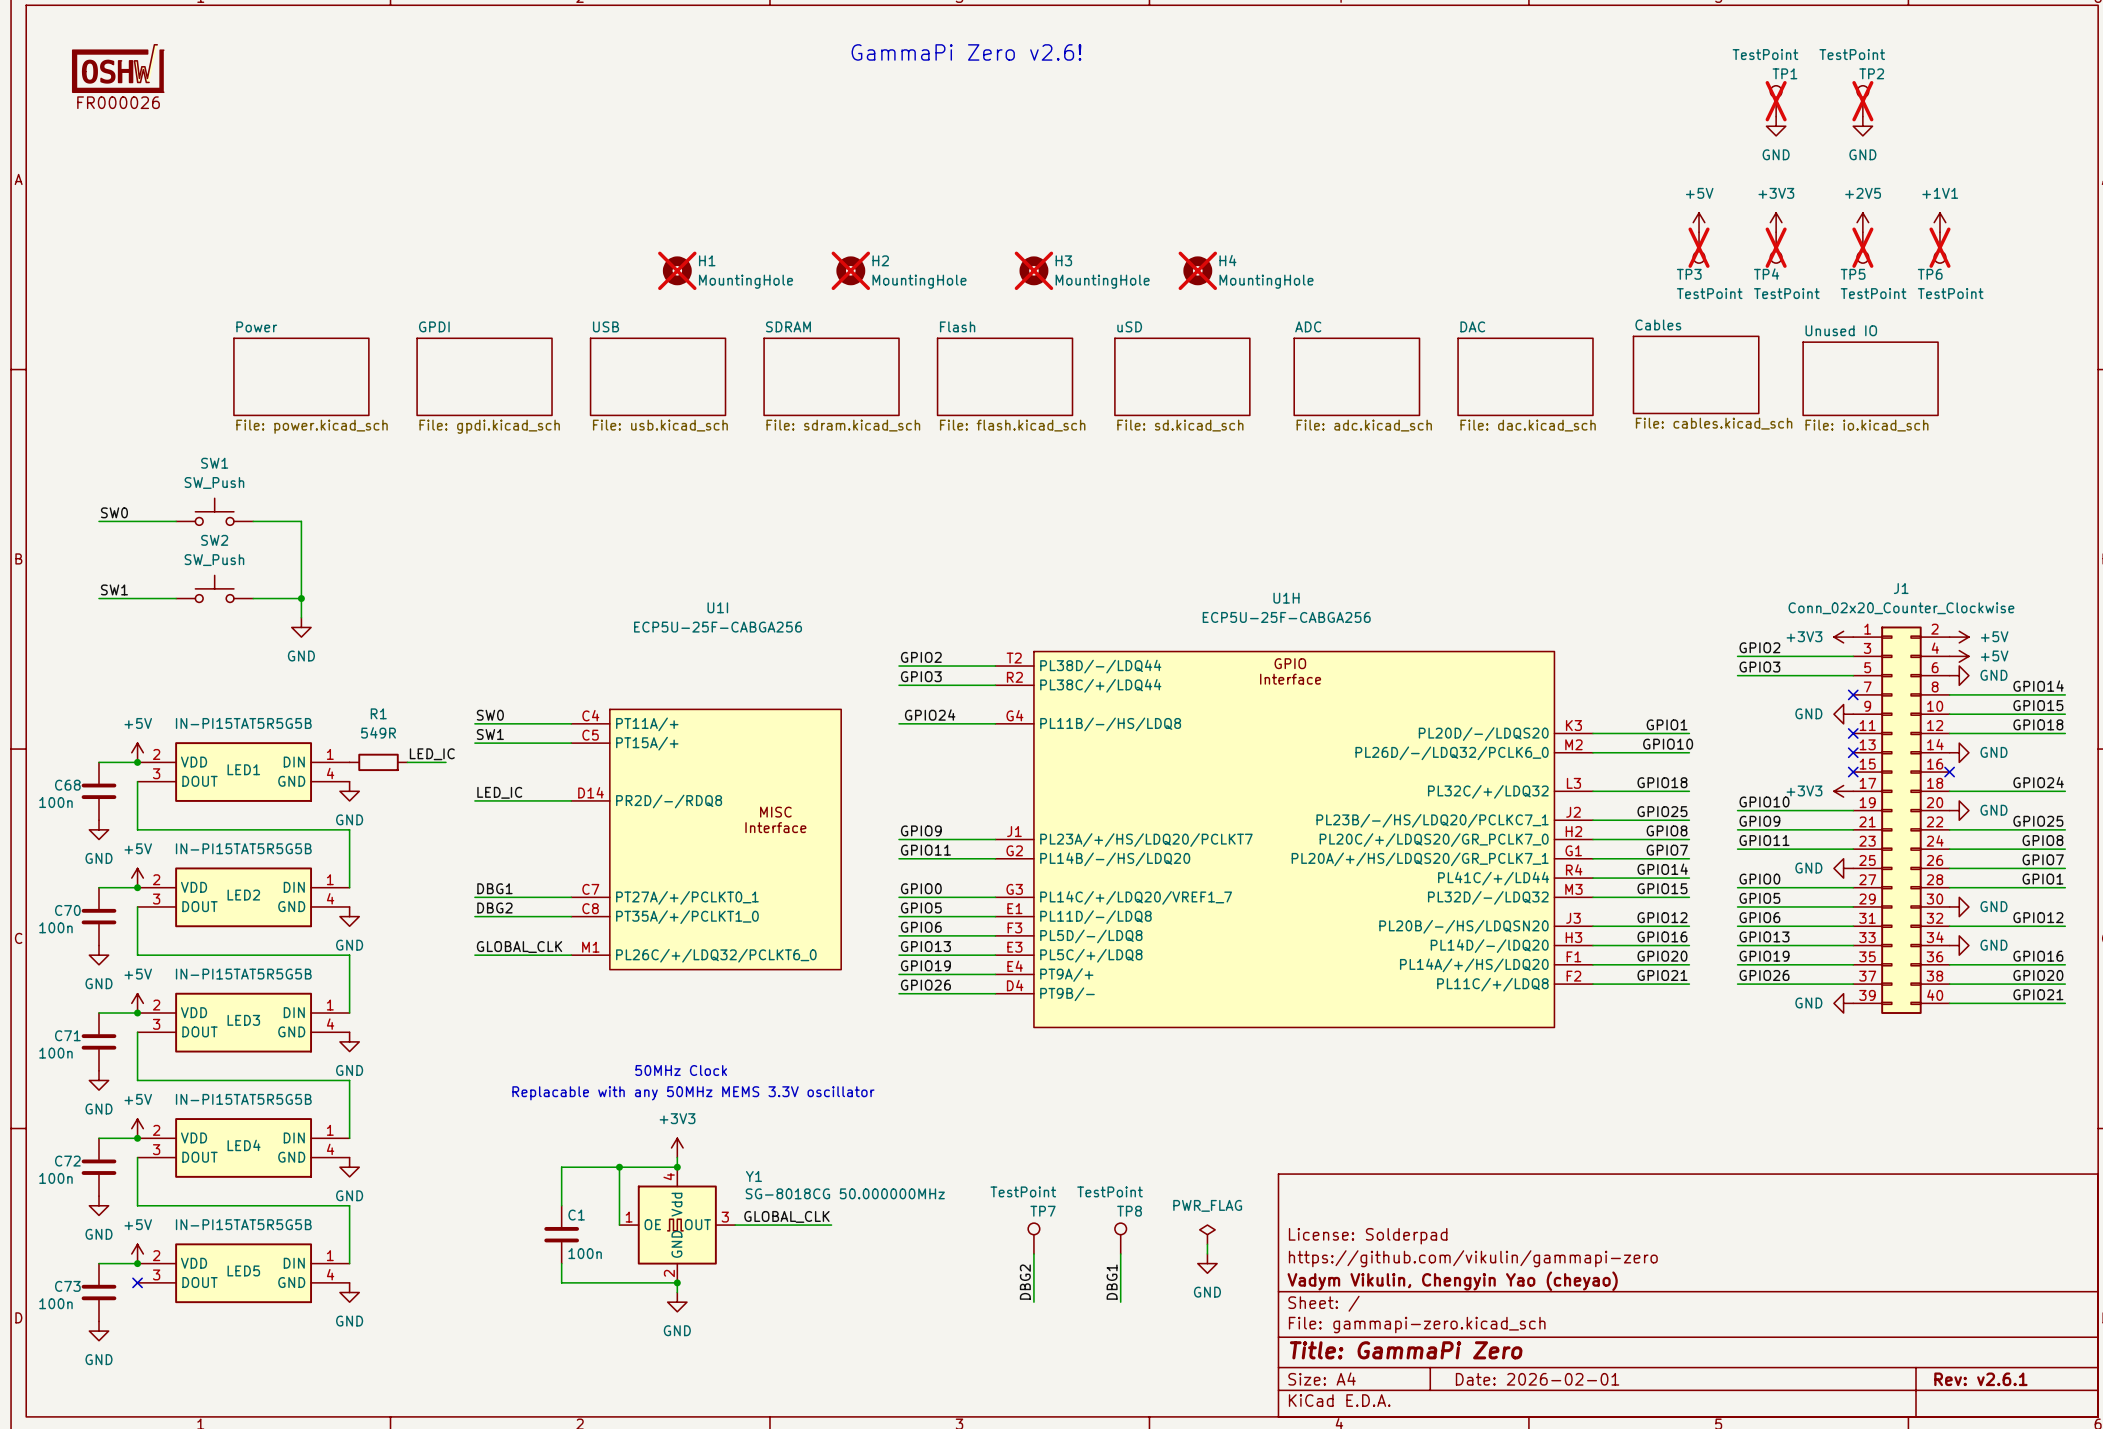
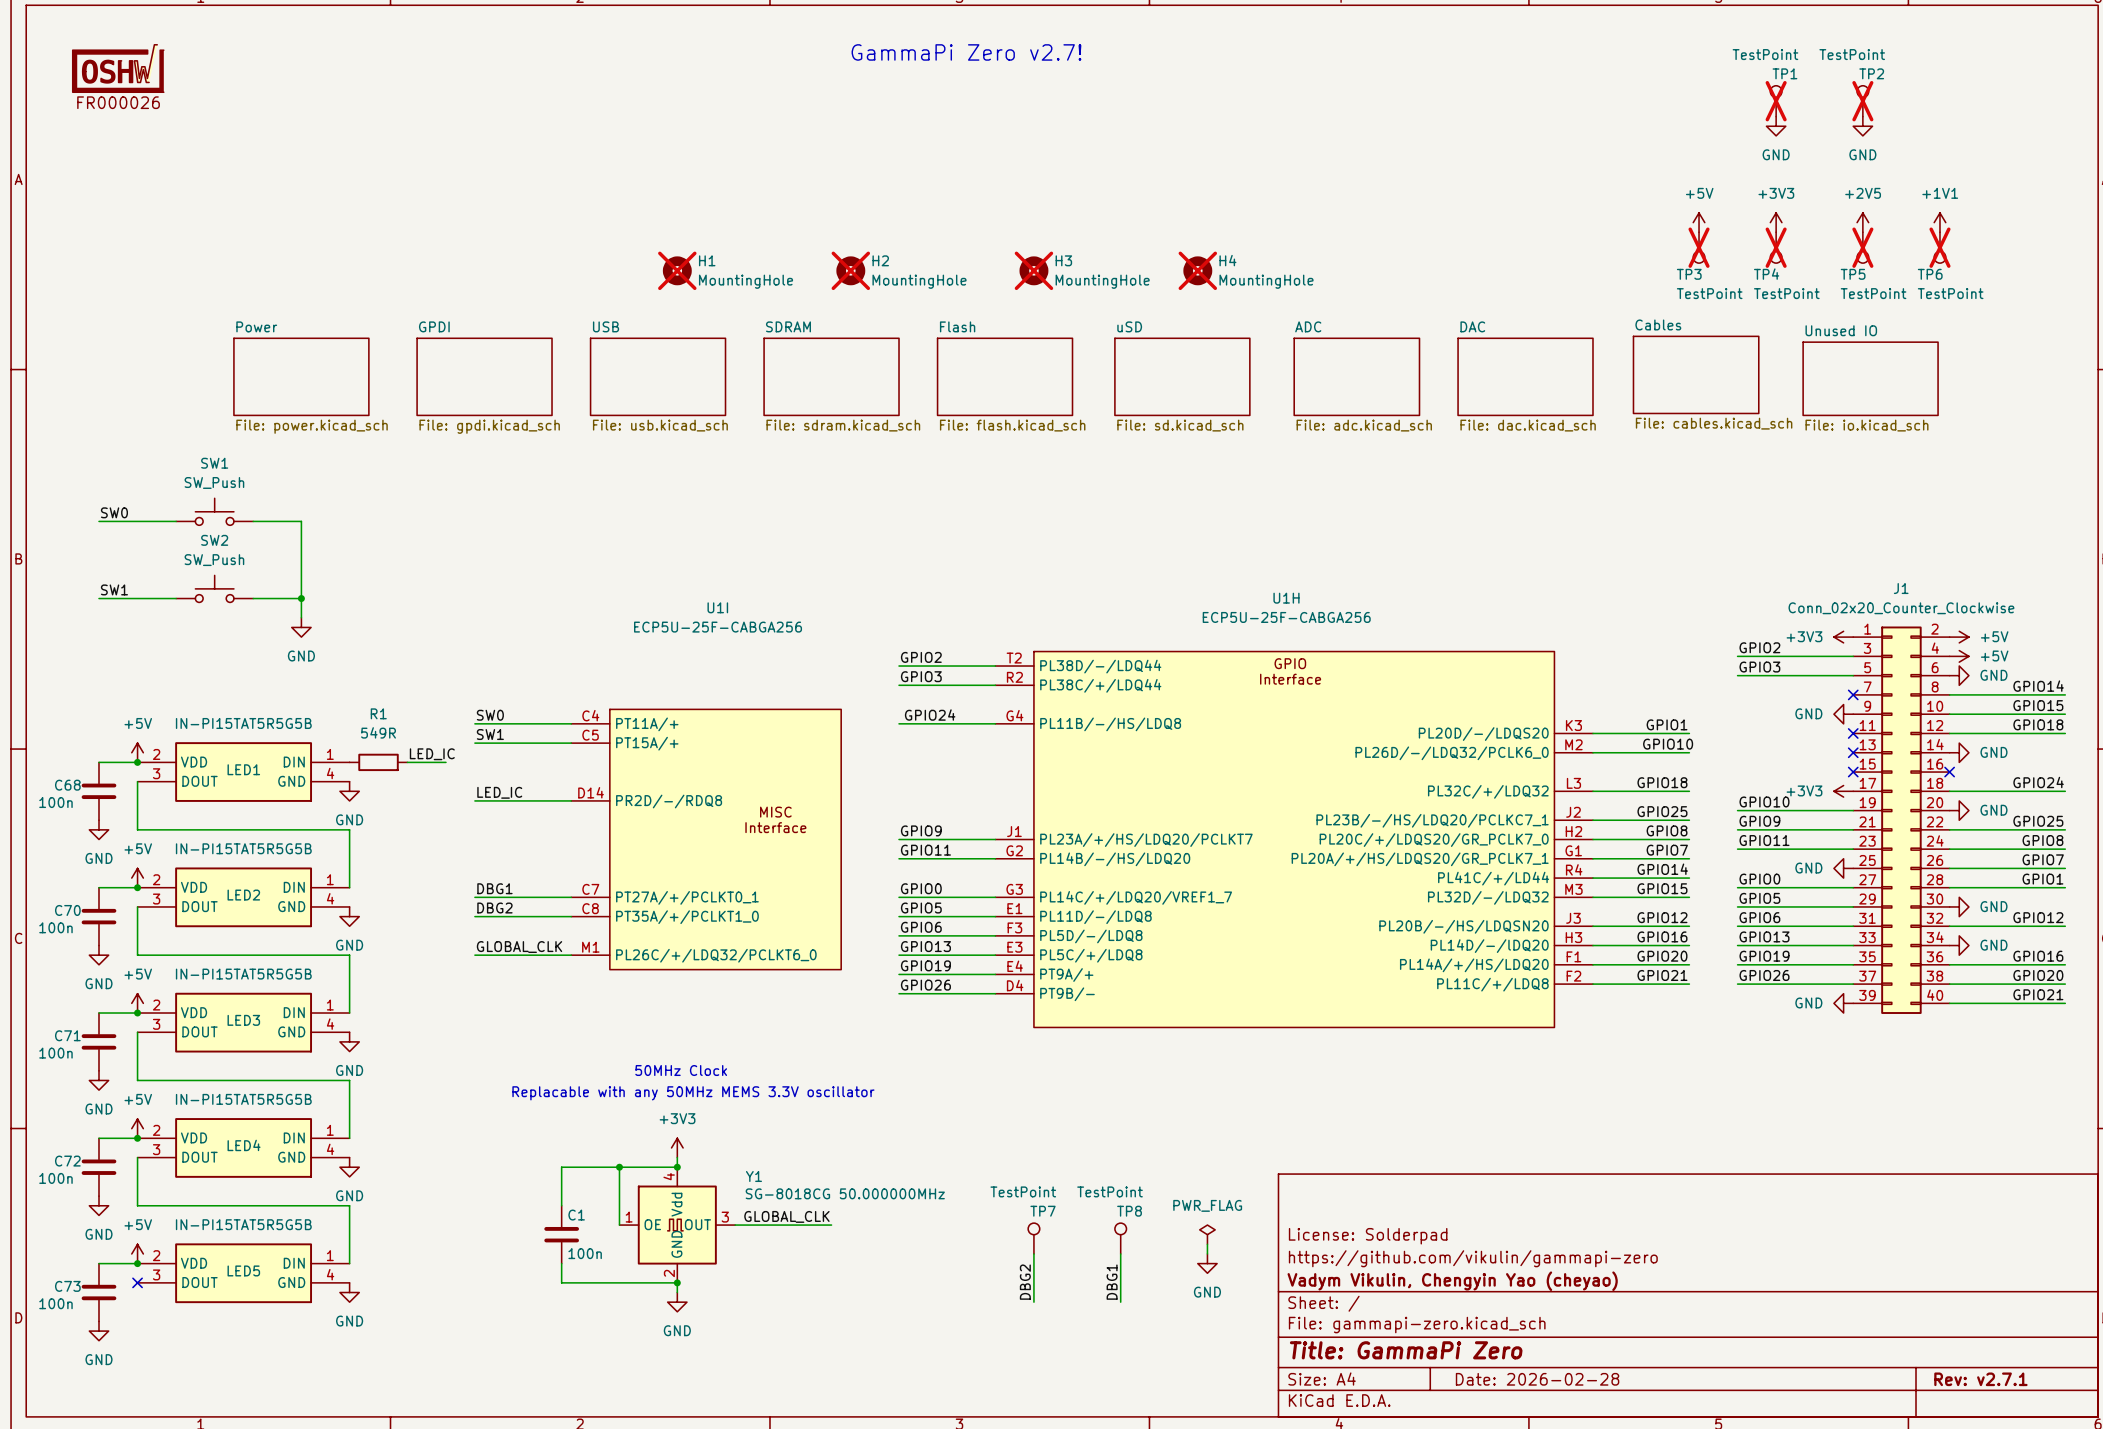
text: GammaPi Zero v2.6! (966, 52) -> GammaPi Zero v2.7! (966, 52)
title block: Date: 2026-02-01 (1537, 1379) -> Date: 2026-02-28 (1537, 1379)
title block: Rev: v2.6.1 (1980, 1379) -> Rev: v2.7.1 (1980, 1379)

